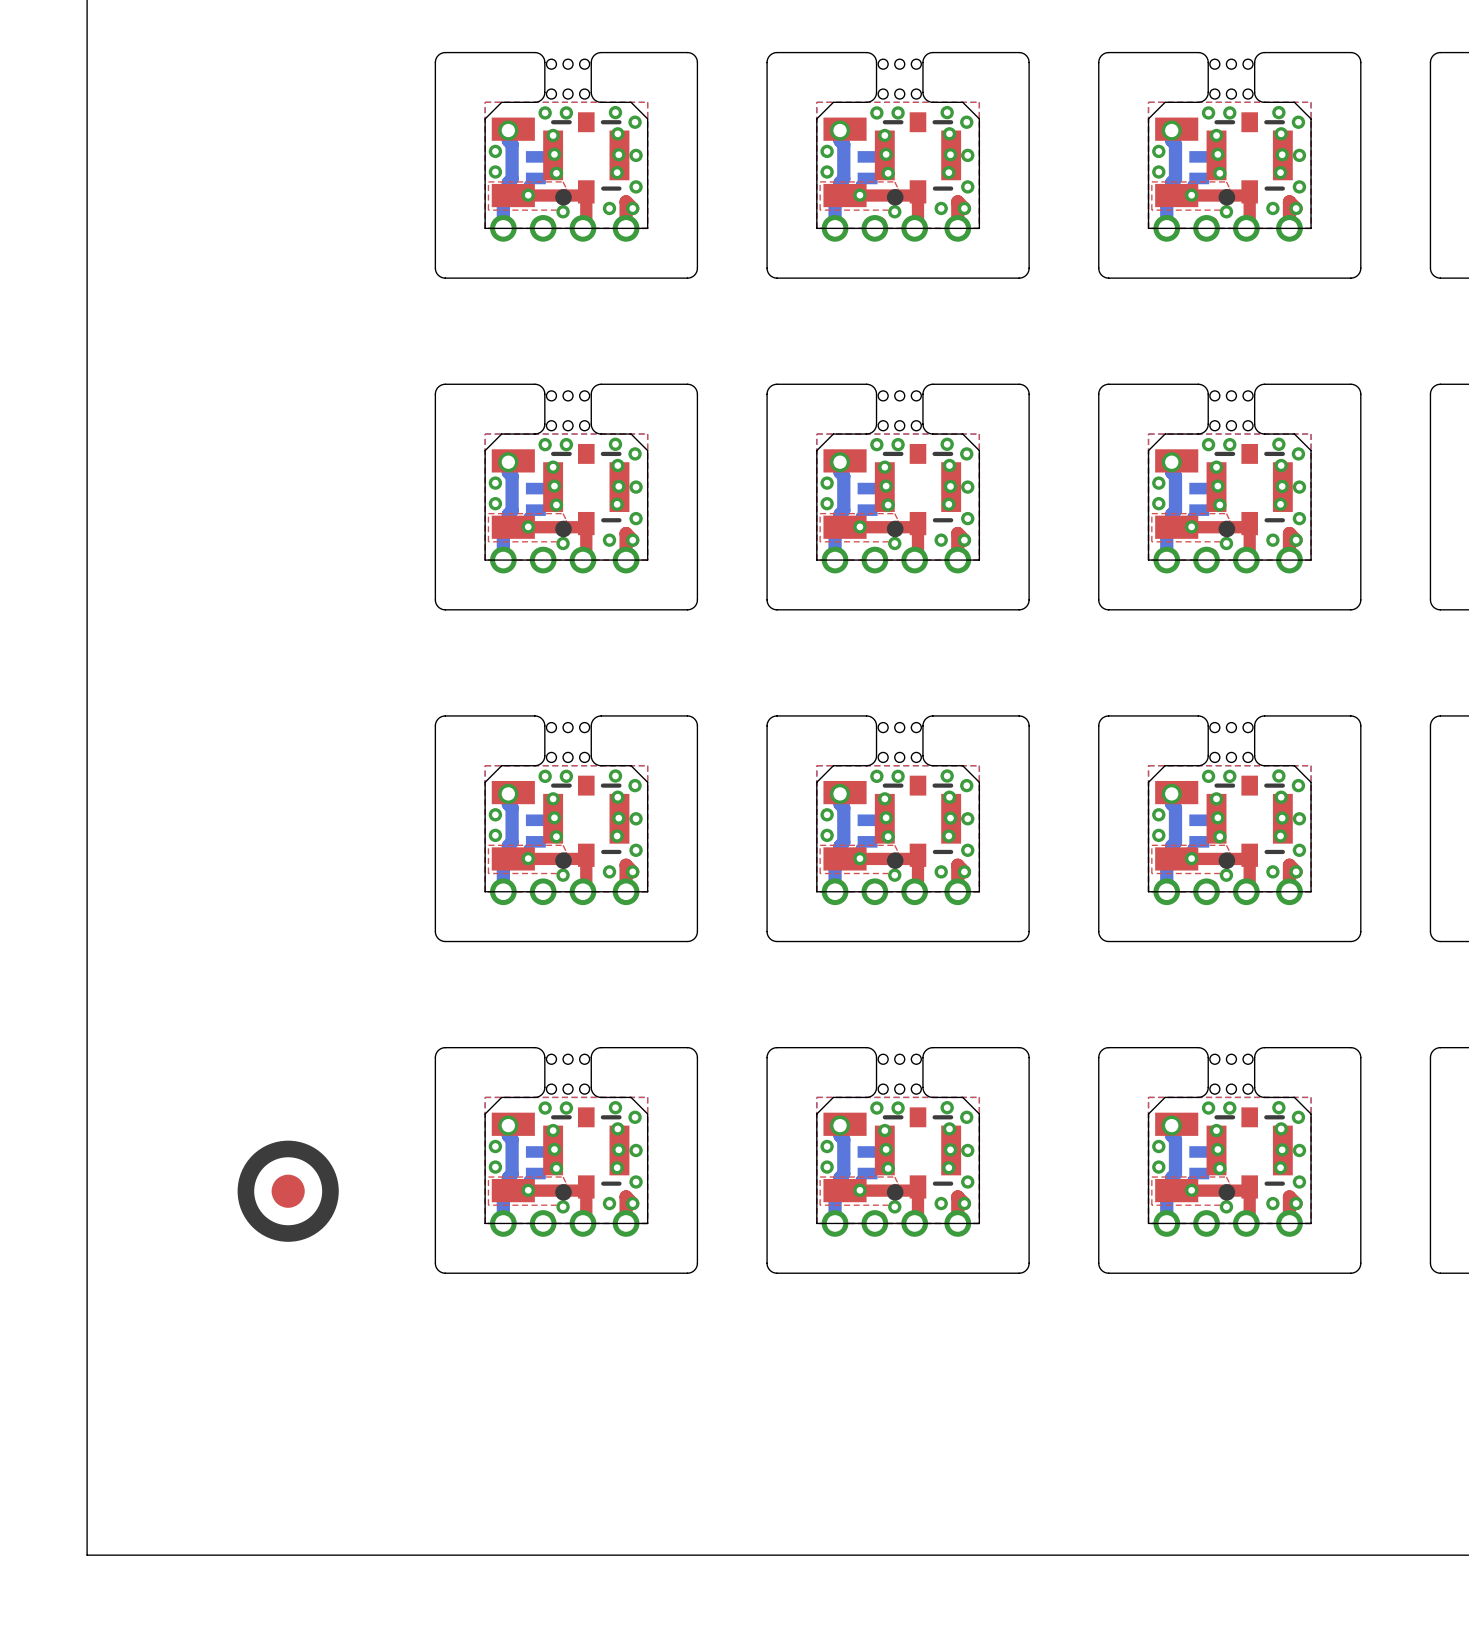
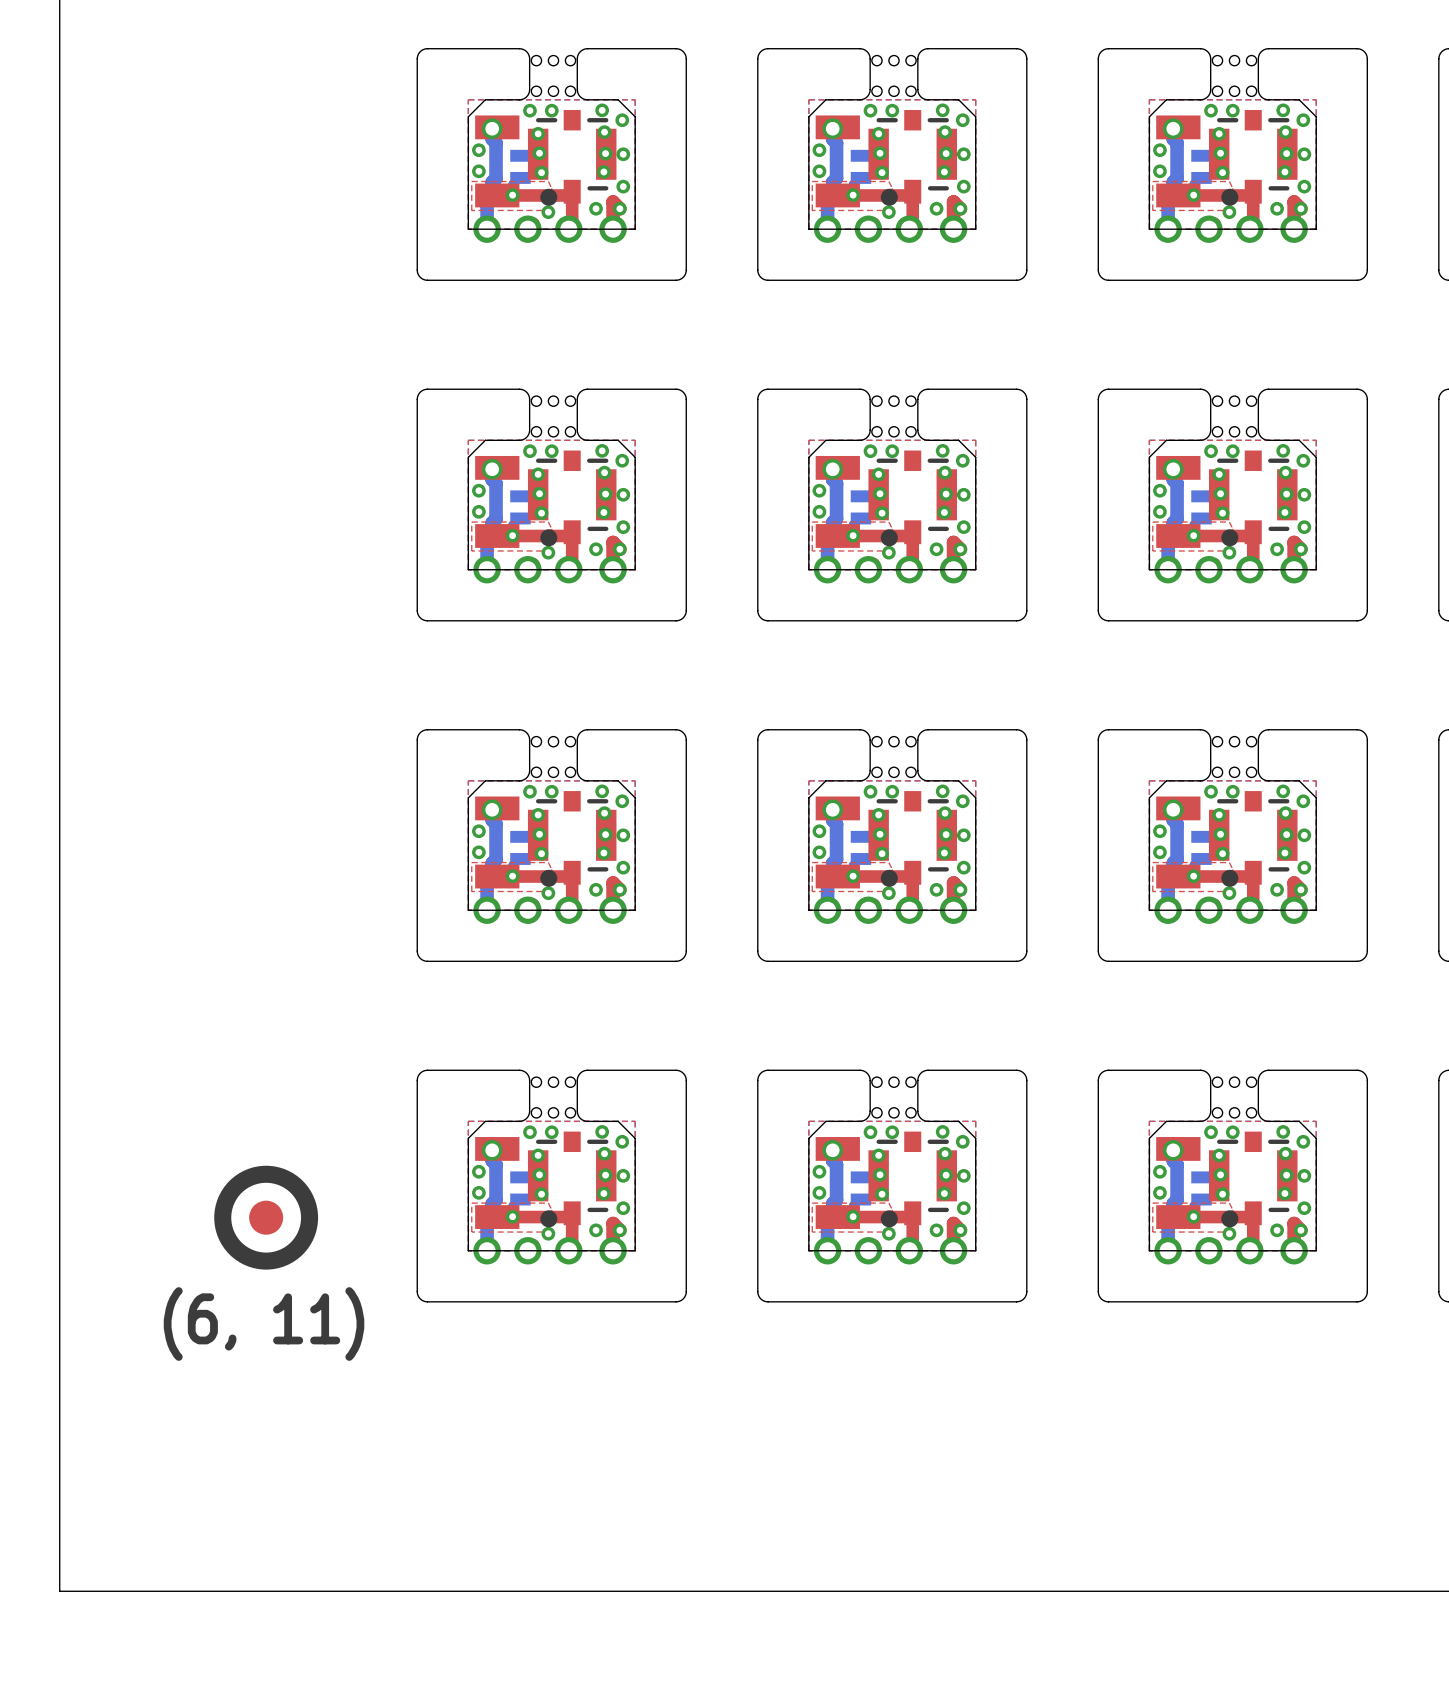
text: none -> (6, 11) (264, 1324)

